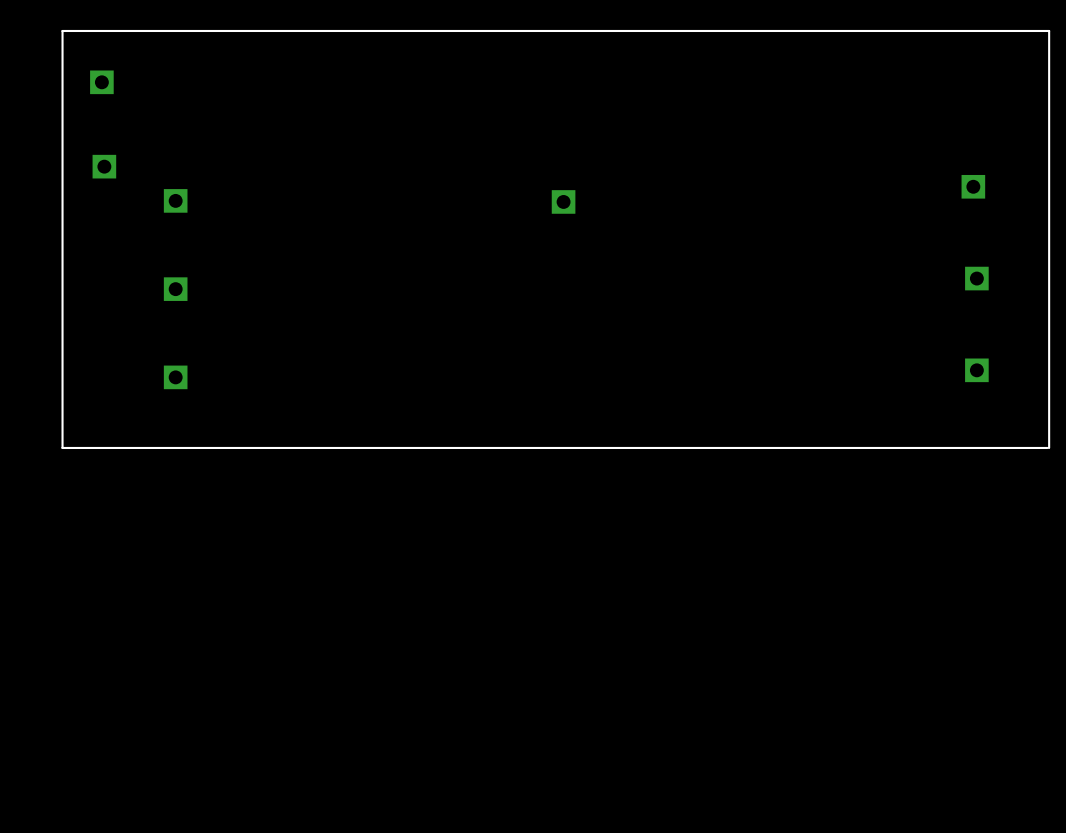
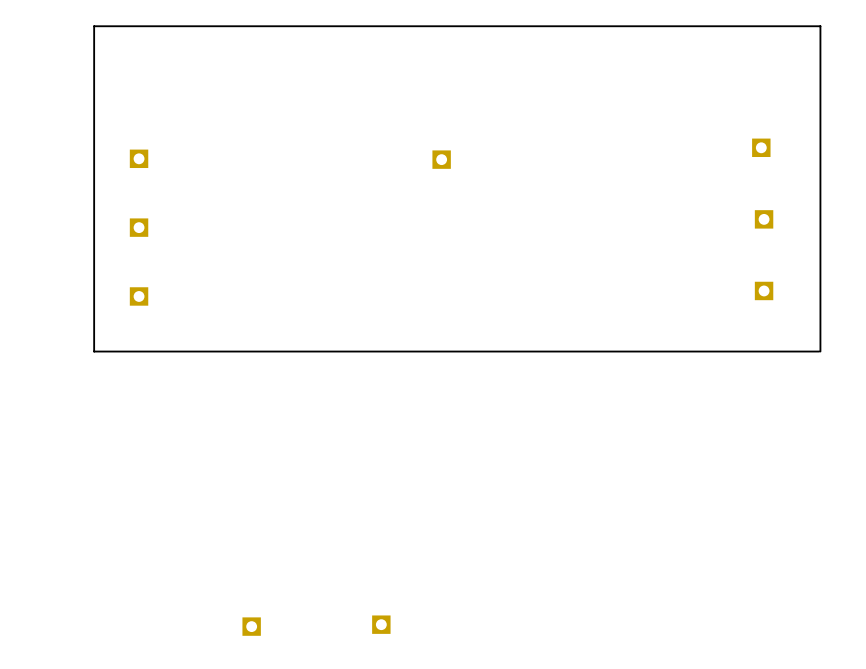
board edge: (118, 30) (62, 30) (62, 447) (118, 447) -> (94, 26) (94, 351)
part: (101, 82) -> none
part: (104, 166) -> none
part: none -> (381, 624)
part: none -> (251, 626)

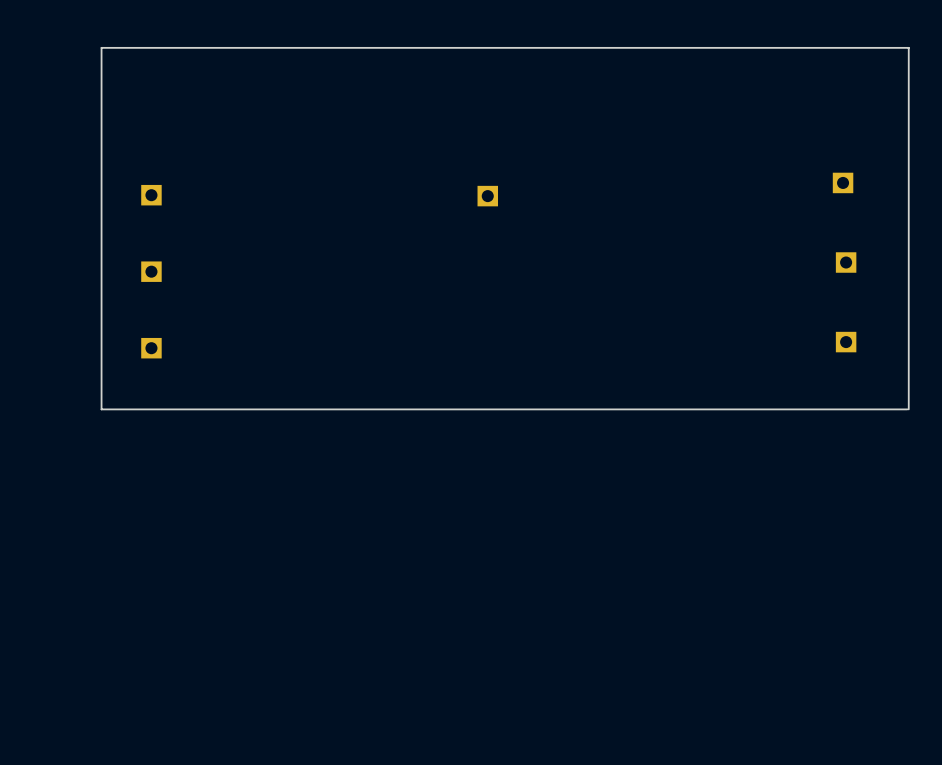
part: (381, 624) -> none
part: (251, 626) -> none

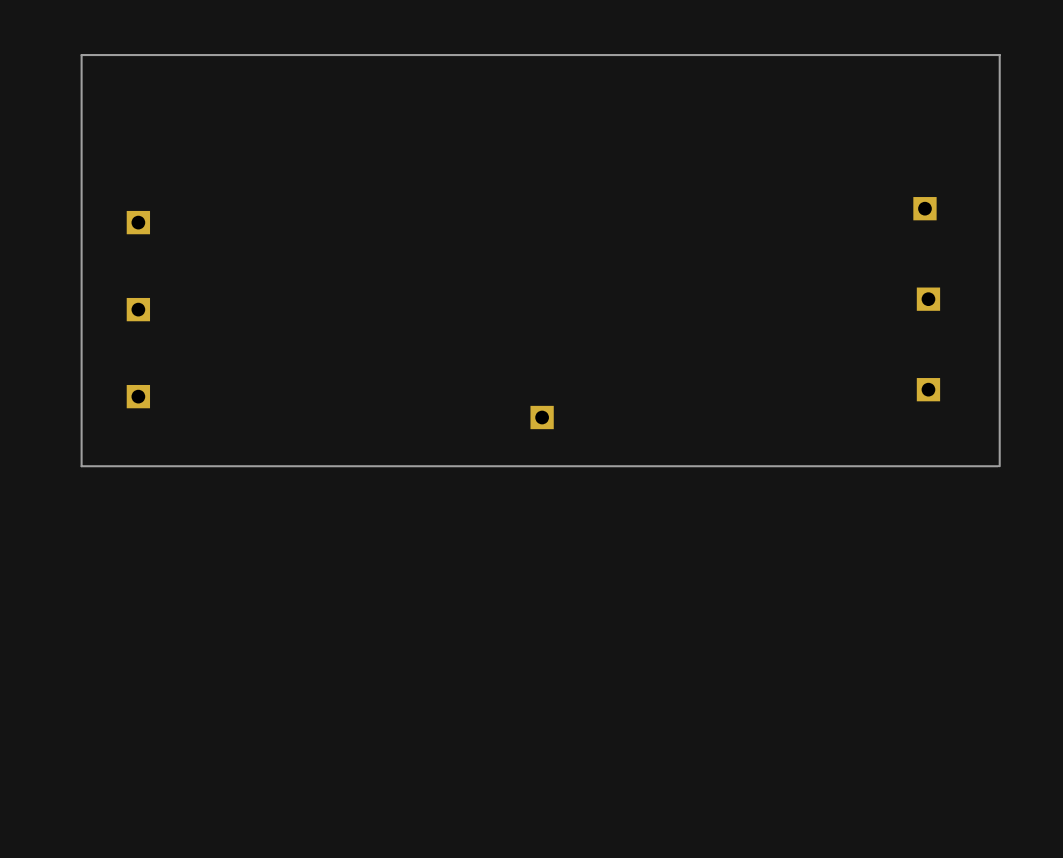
part position: (487, 196) -> (542, 417)

